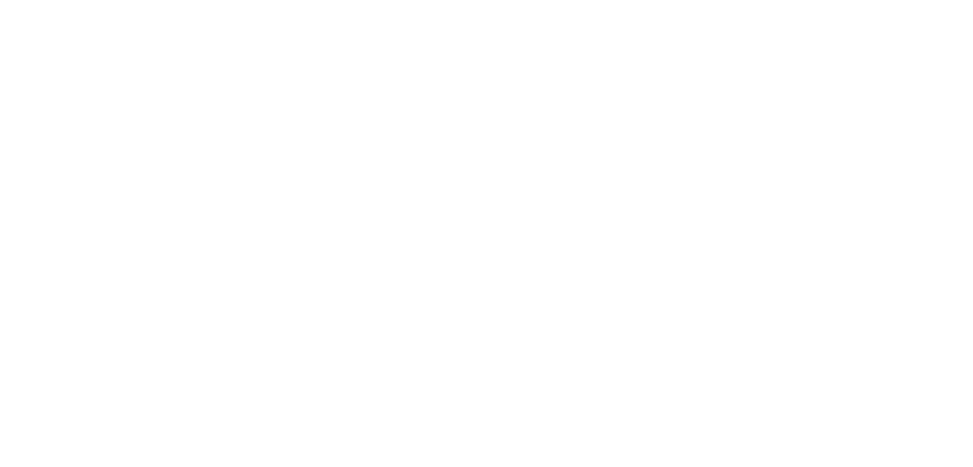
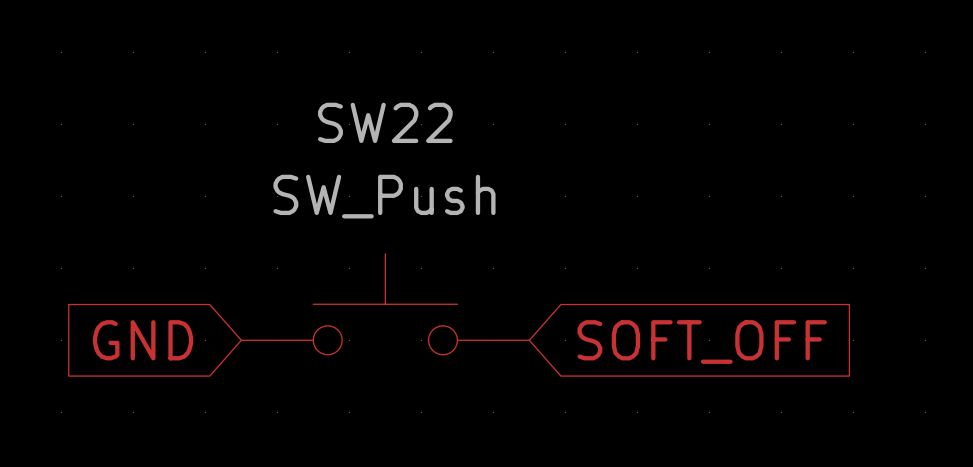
SW22: none -> SW_Push (385, 304)
global label: none -> GND (143, 340)
global label: none -> SOFT_OFF (702, 342)

